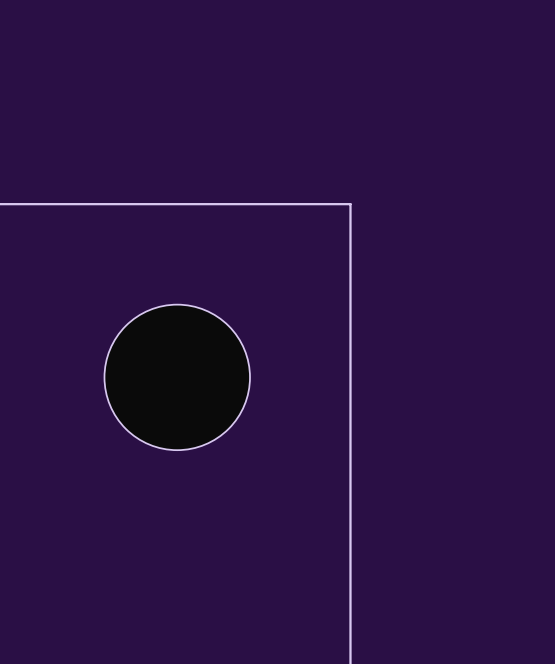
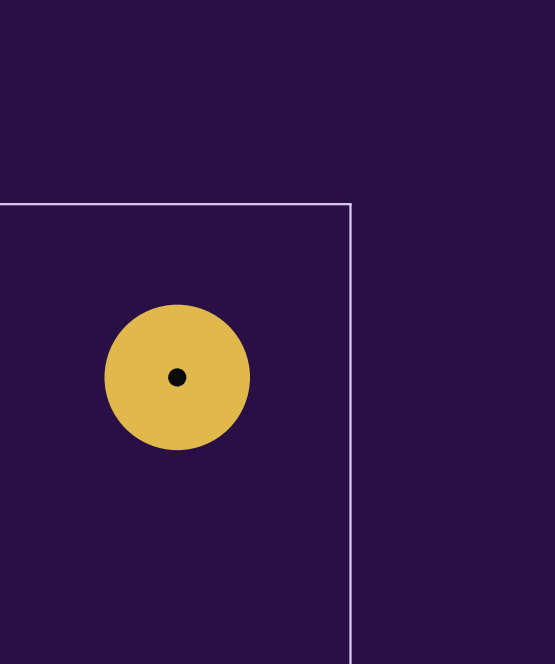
part footprint: [104, 304, 250, 451] -> [104, 304, 250, 451]

